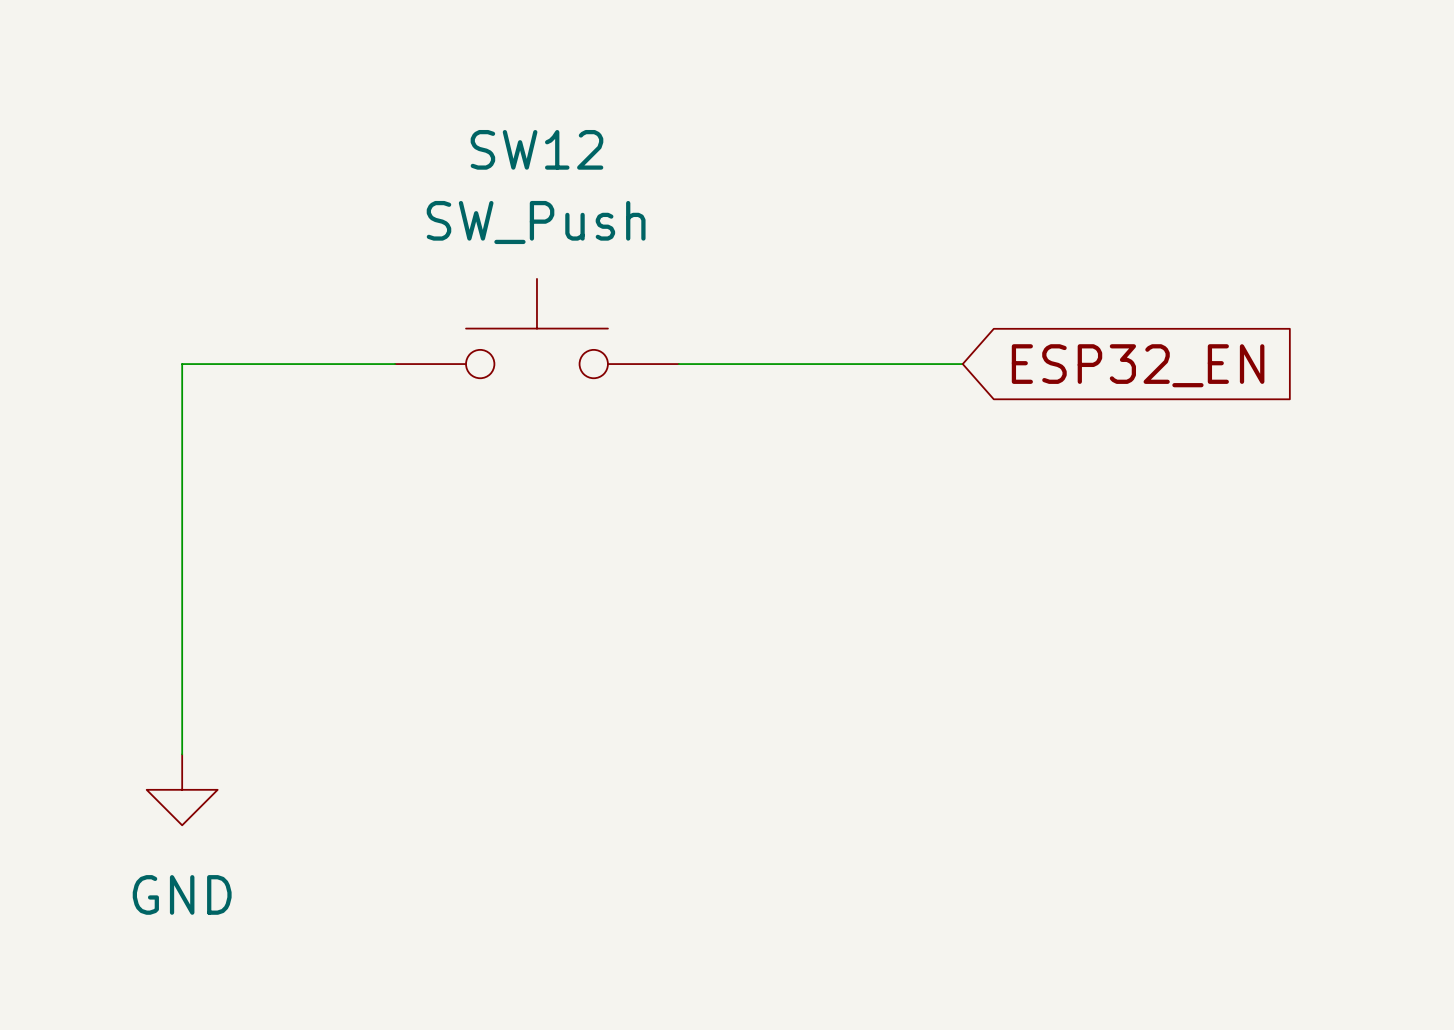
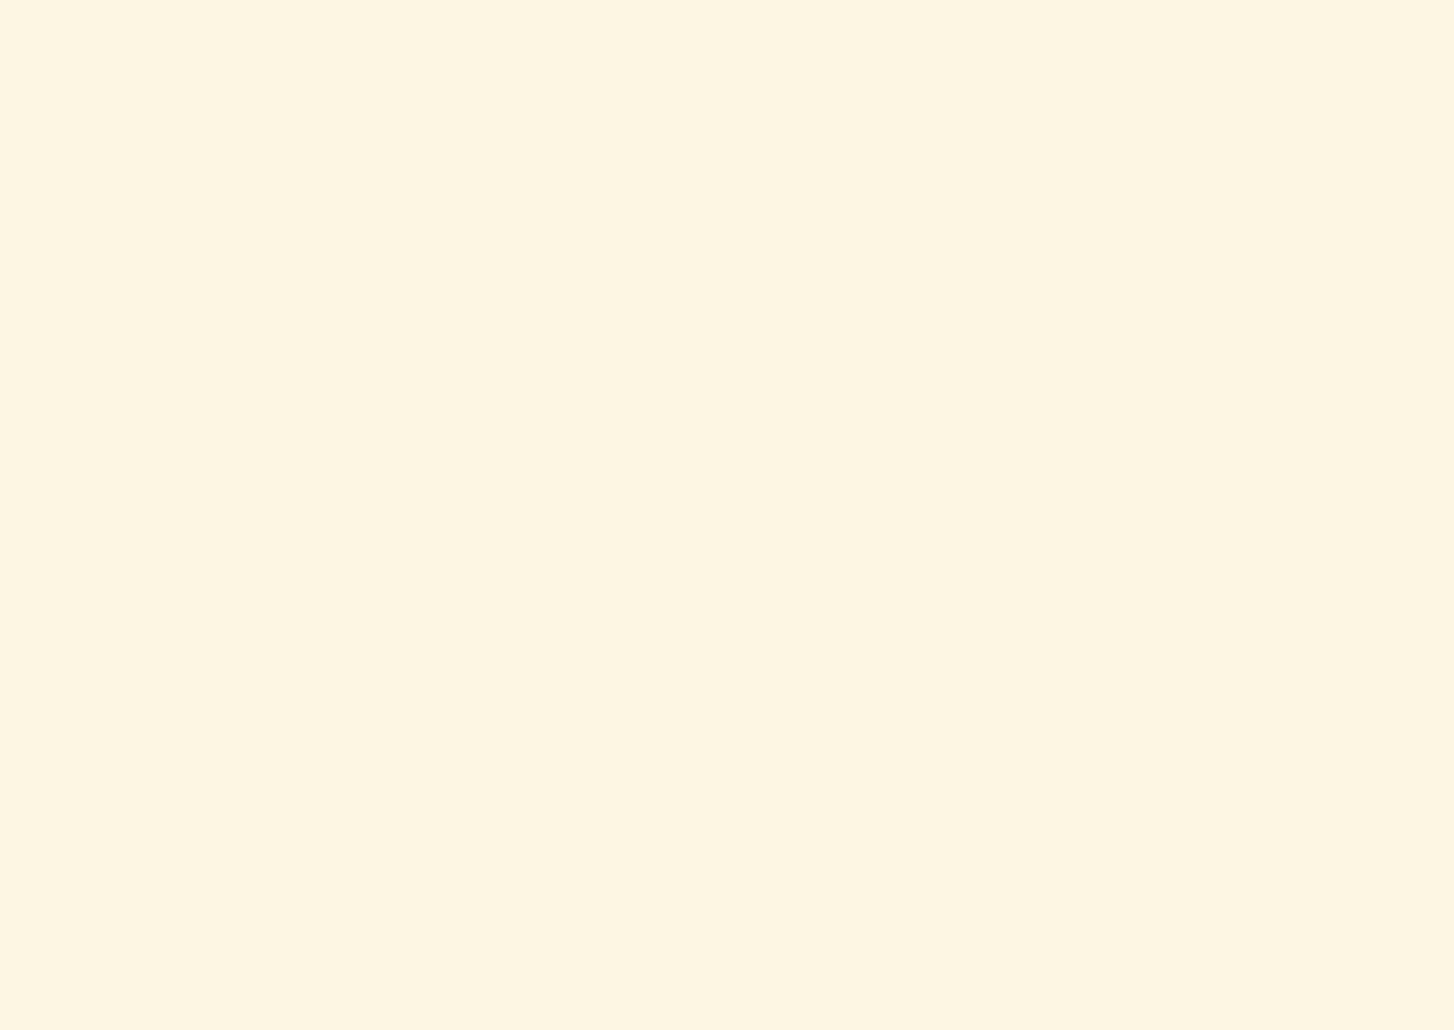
SW12: SW_Push (536, 328) -> none
wire: (395, 364) (182, 364) (182, 754) -> none
wire: (678, 364) (962, 364) -> none
global label: ESP32_EN (1138, 365) -> none
power symbol: GND (182, 789) -> none

